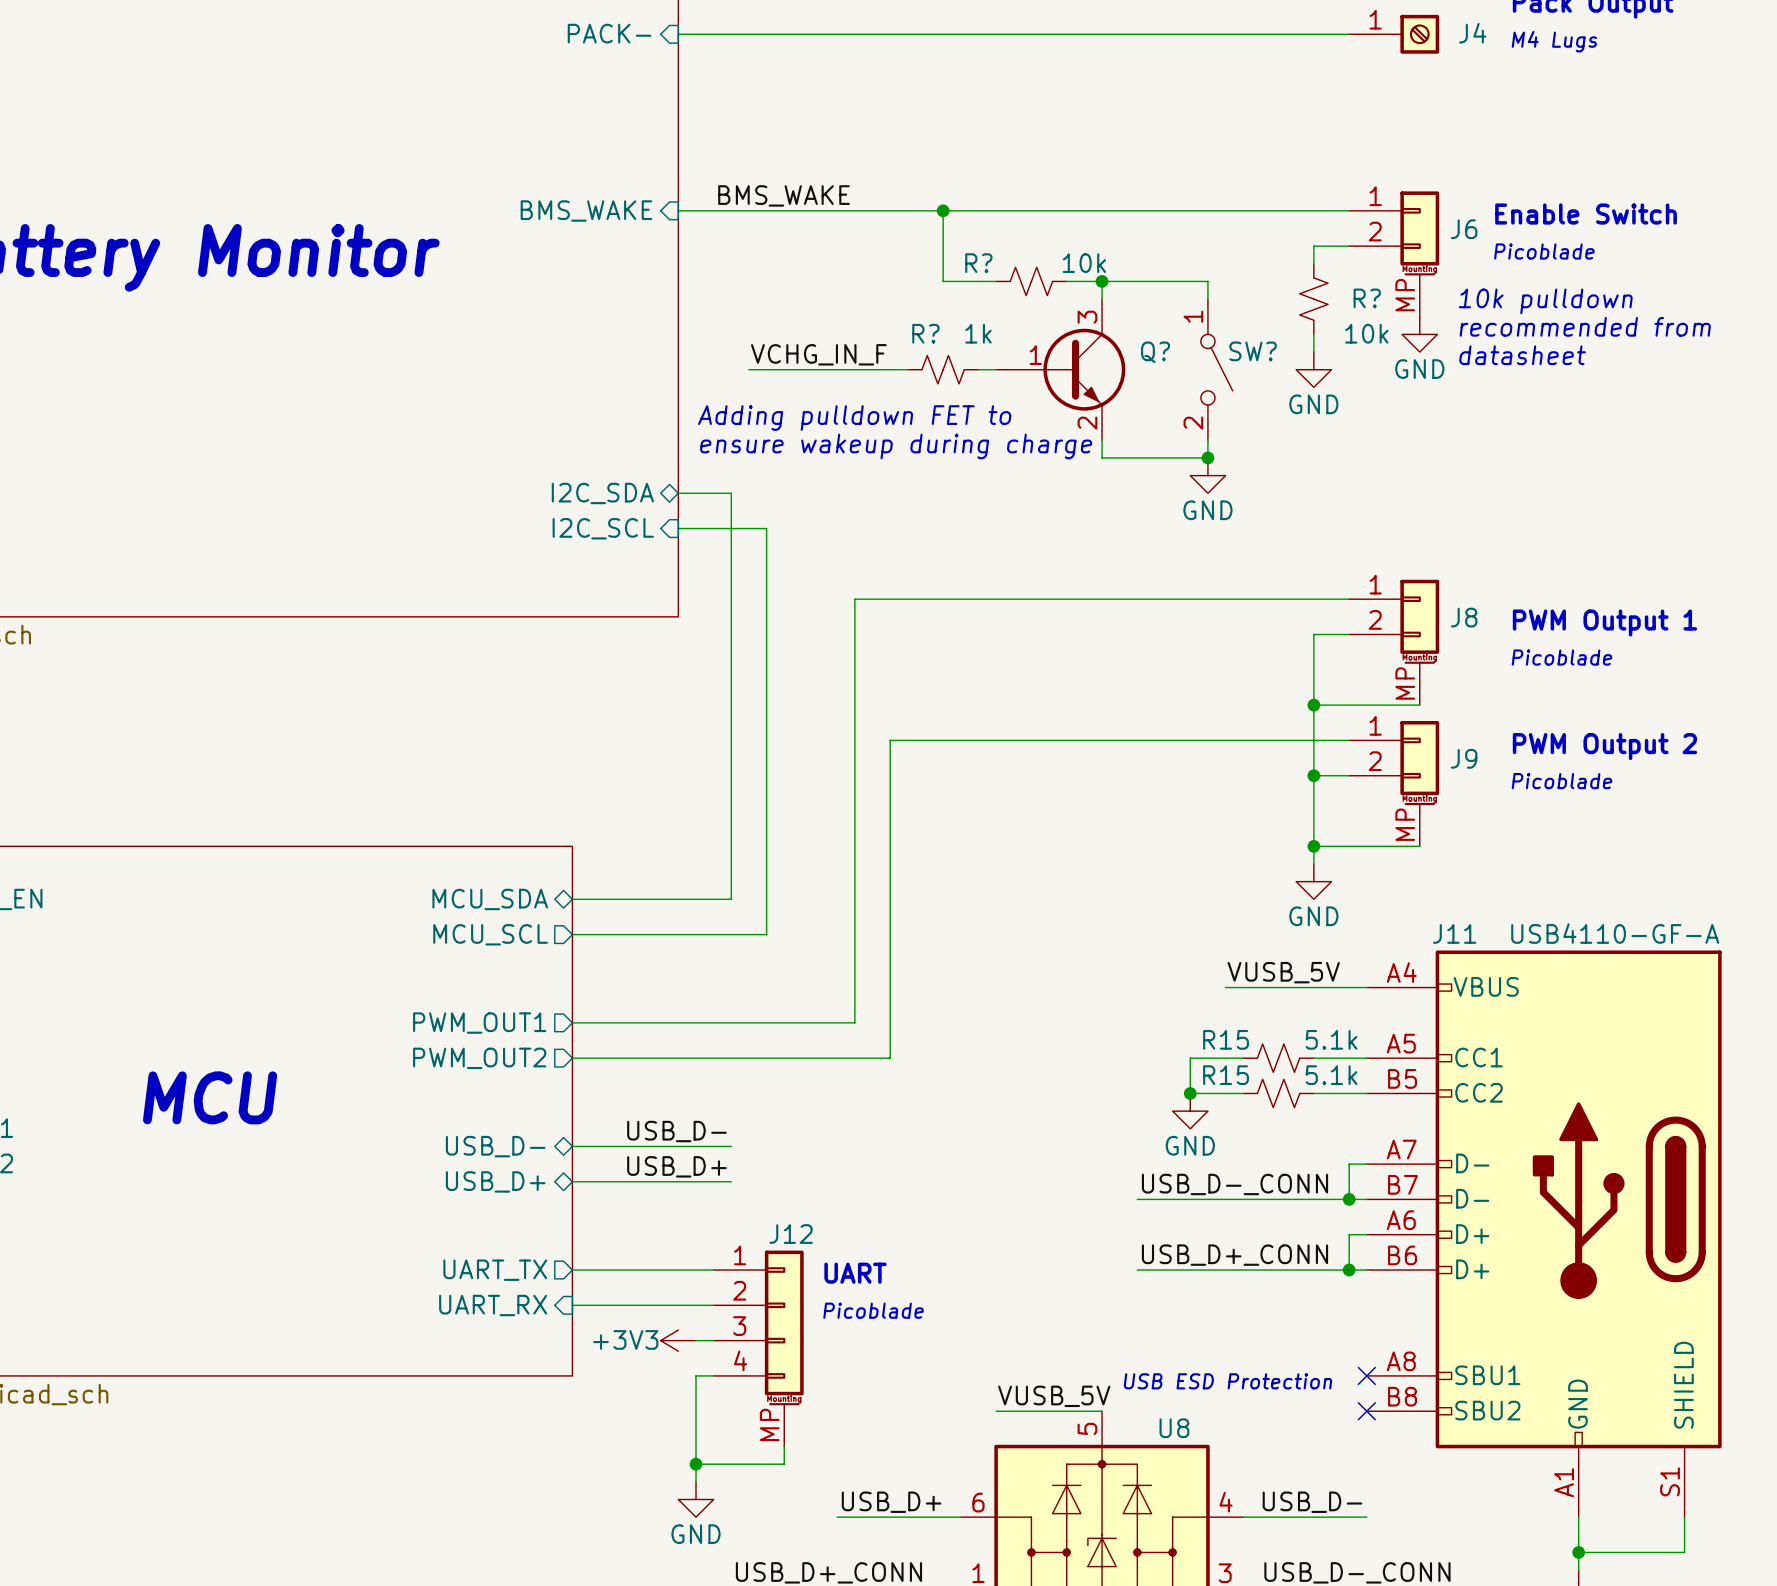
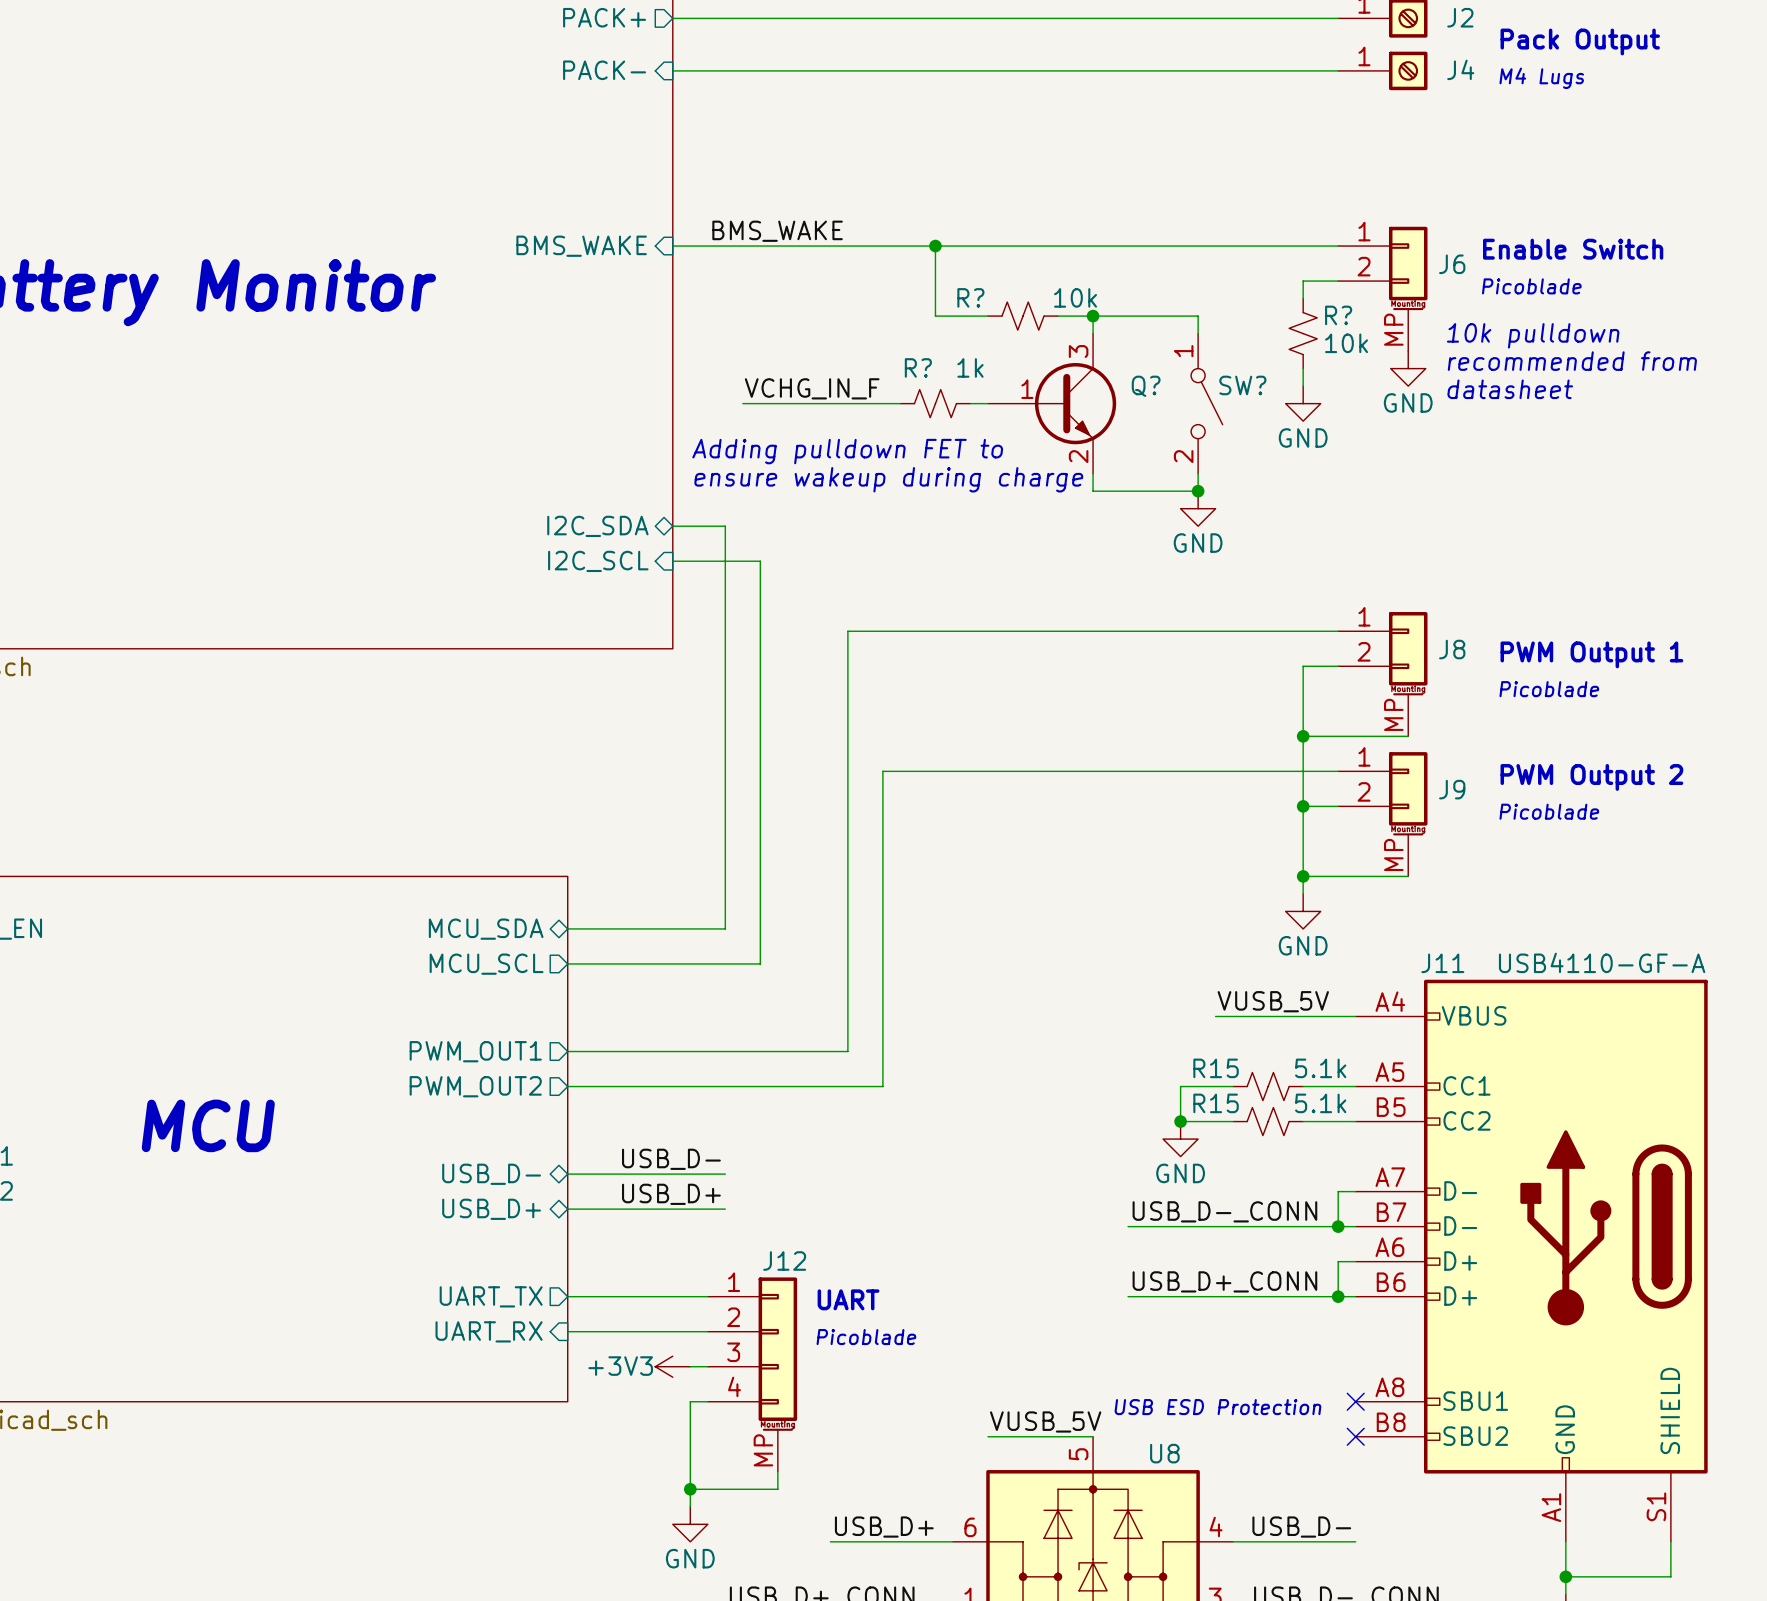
R? name position: R? (1367, 298) -> R? (1338, 315)
R? value position: 10k (1366, 333) -> 10k (1346, 343)

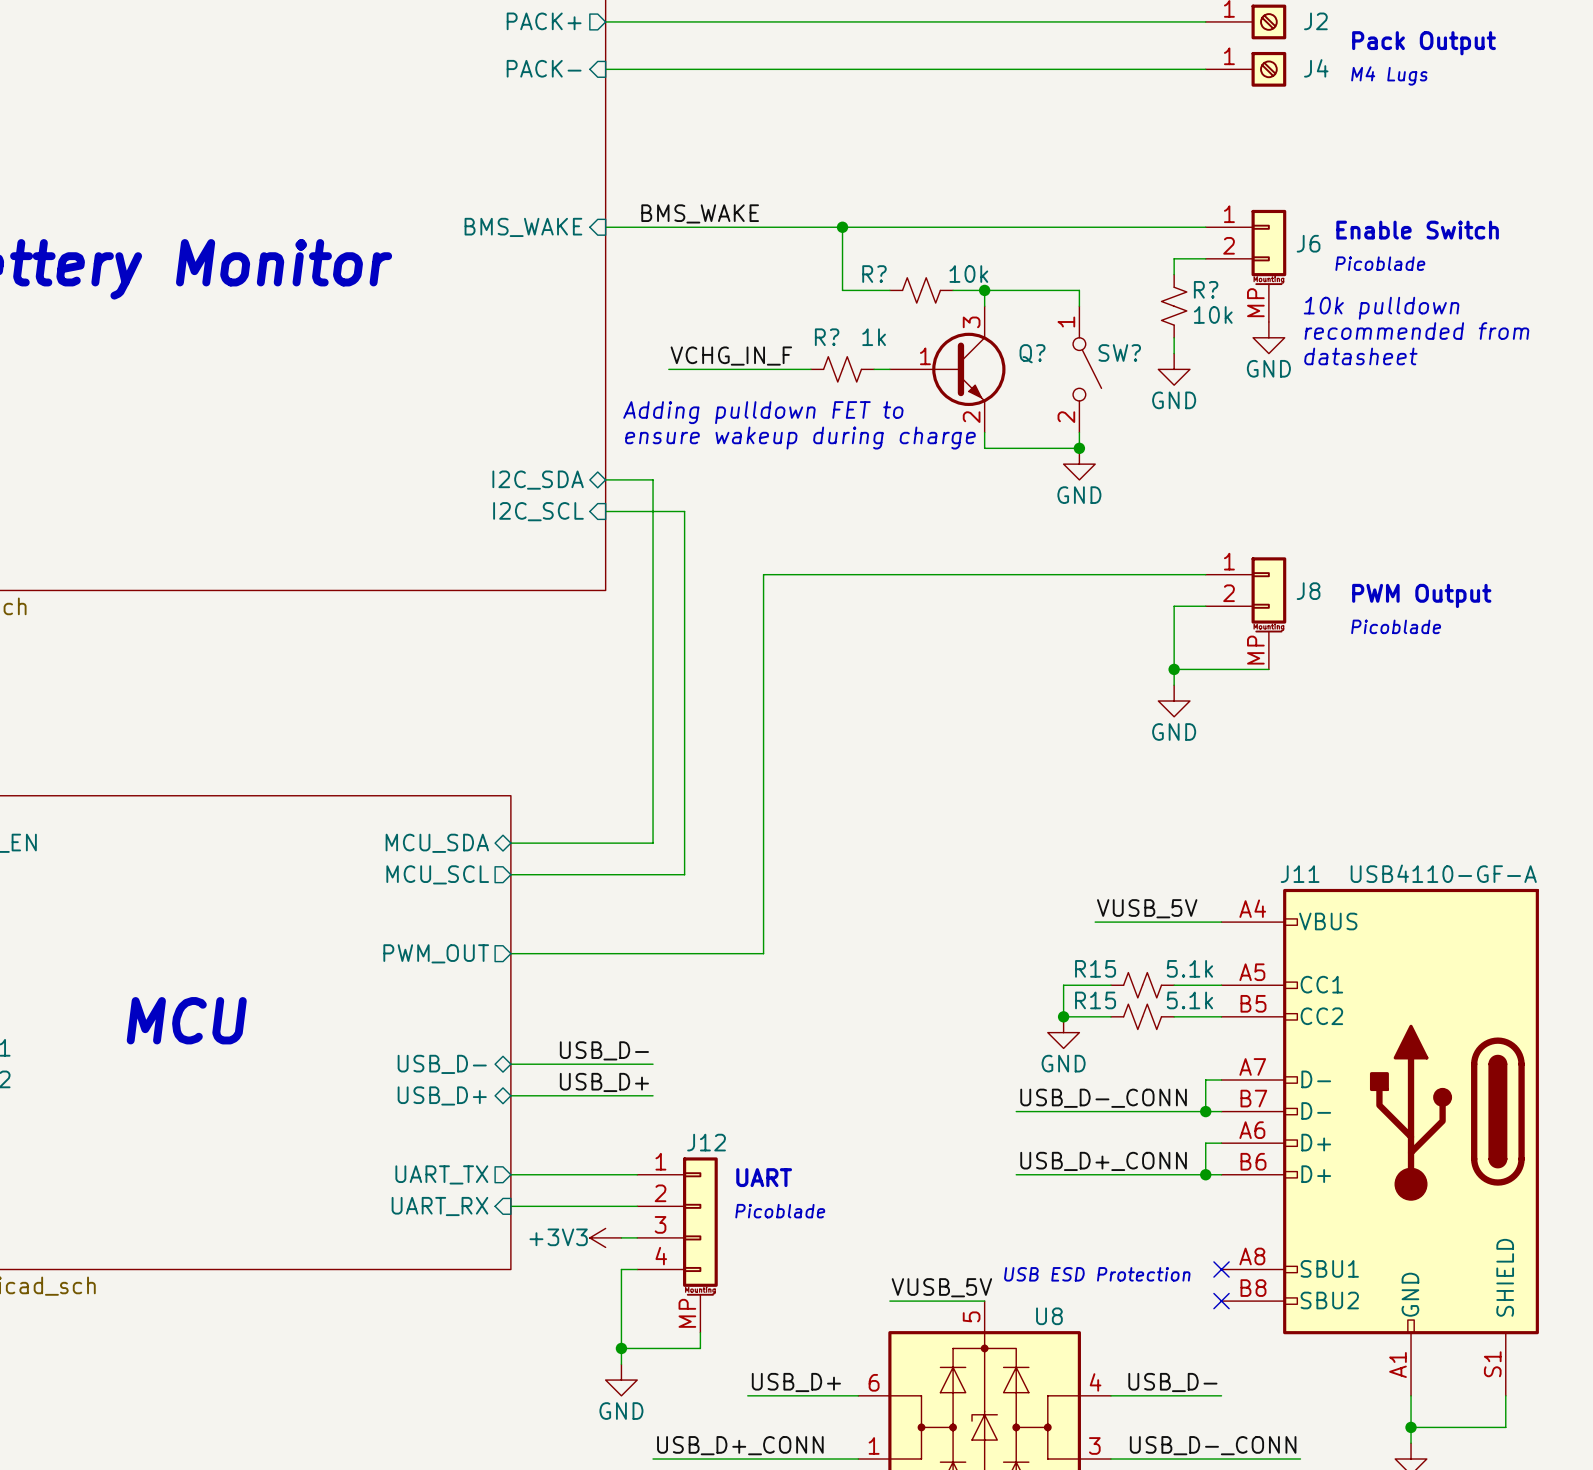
text: PWM Output 1 (1591, 654) -> PWM Output (1421, 595)
wire: (1303, 753) (1303, 893) -> none
wire: (1338, 771) (882, 771) (882, 1086) (567, 1086) -> none
text: PWM Output 2 (1591, 777) -> none
wire: (1303, 806) (1338, 806) -> none
junction: (1303, 806) -> none
text: Picoblade (1549, 811) -> none
J9: (1382, 814) -> none
wire: (1303, 876) (1408, 876) -> none
junction: (1303, 876) -> none
power symbol position: GND (1303, 911) -> GND (1174, 701)
sheet pin: PWM_OUT1 (475, 1051) -> PWM_OUT (436, 953)
sheet pin: PWM_OUT2 (475, 1086) -> none

